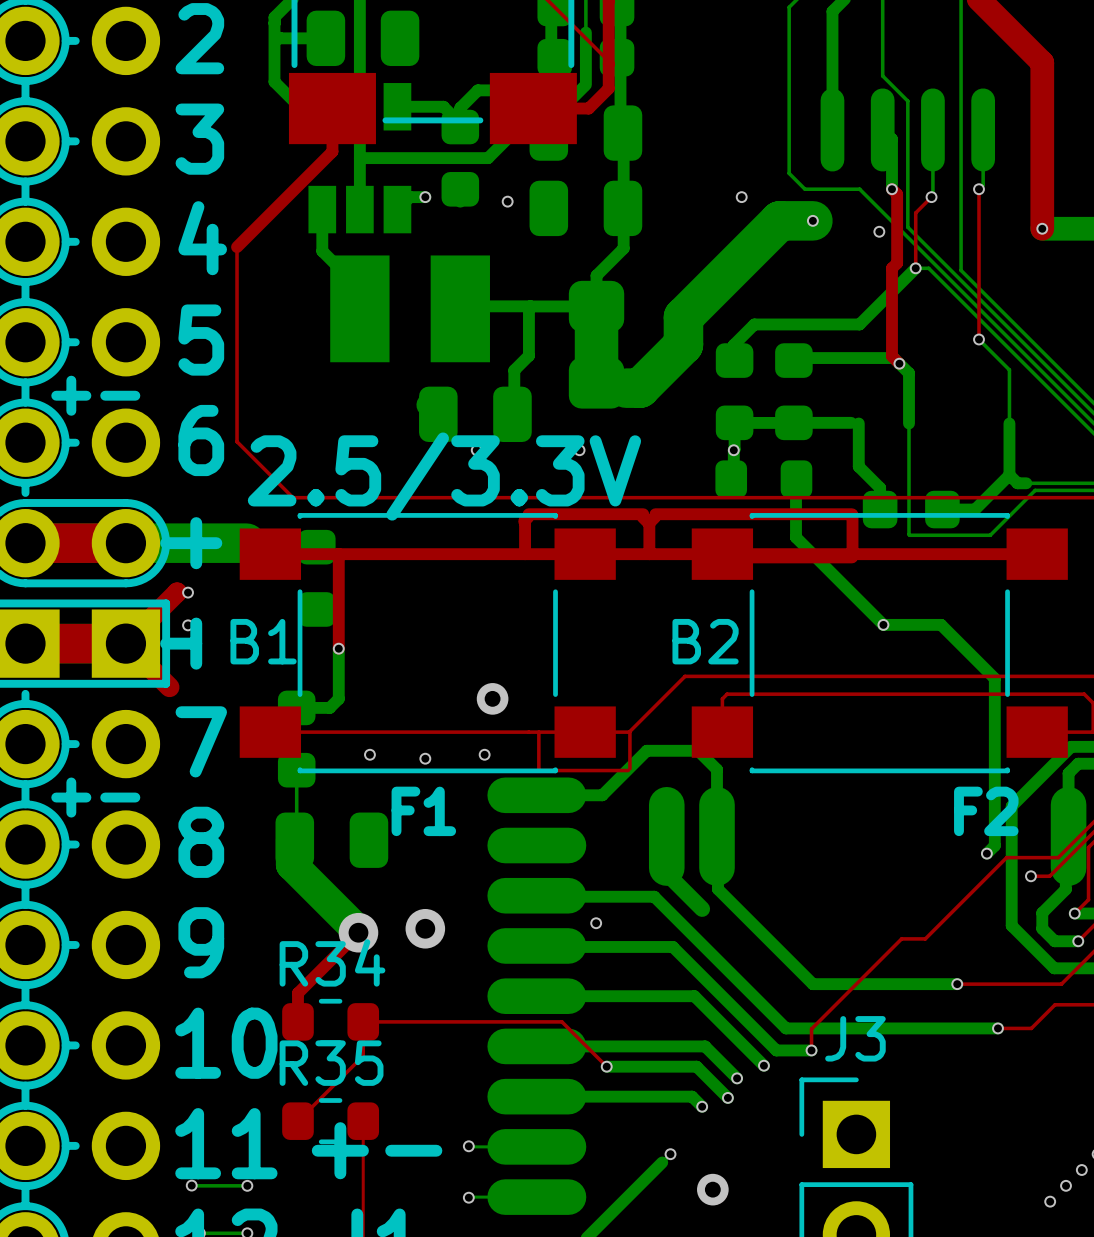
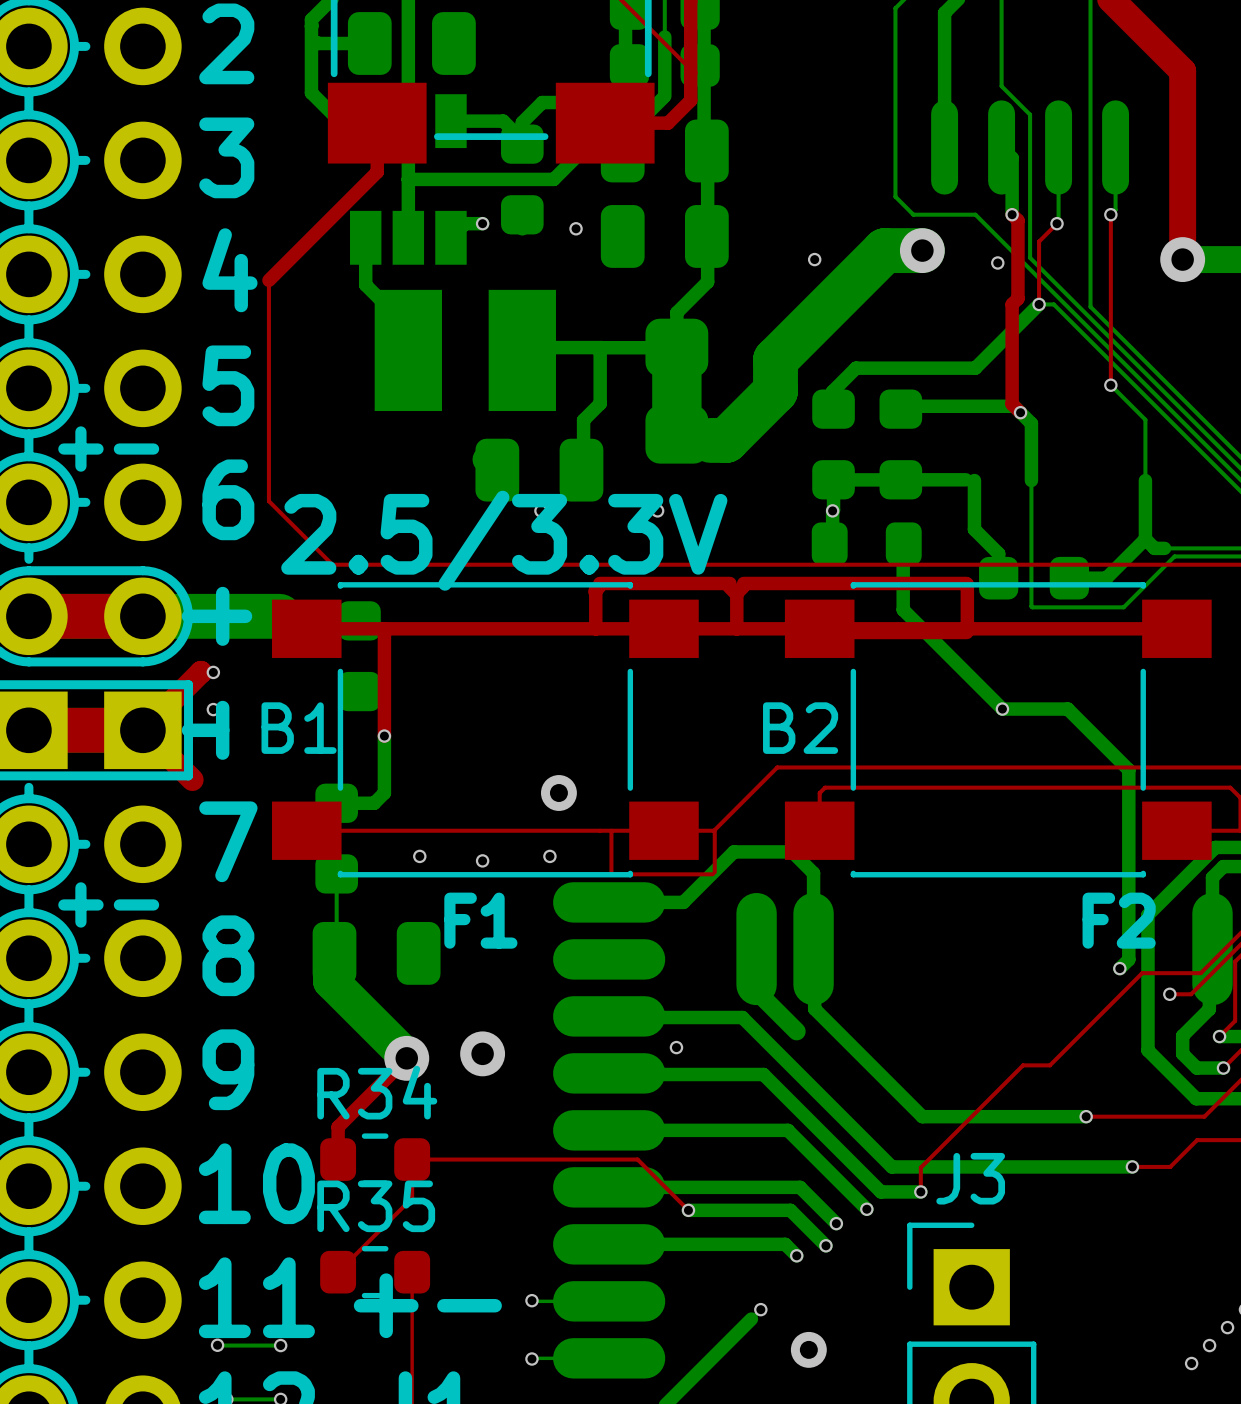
via position: (741, 197) -> (814, 259)
via size: [806, 214, 819, 227] -> [899, 228, 945, 274]
via size: [1036, 222, 1049, 235] -> [1160, 237, 1206, 283]

